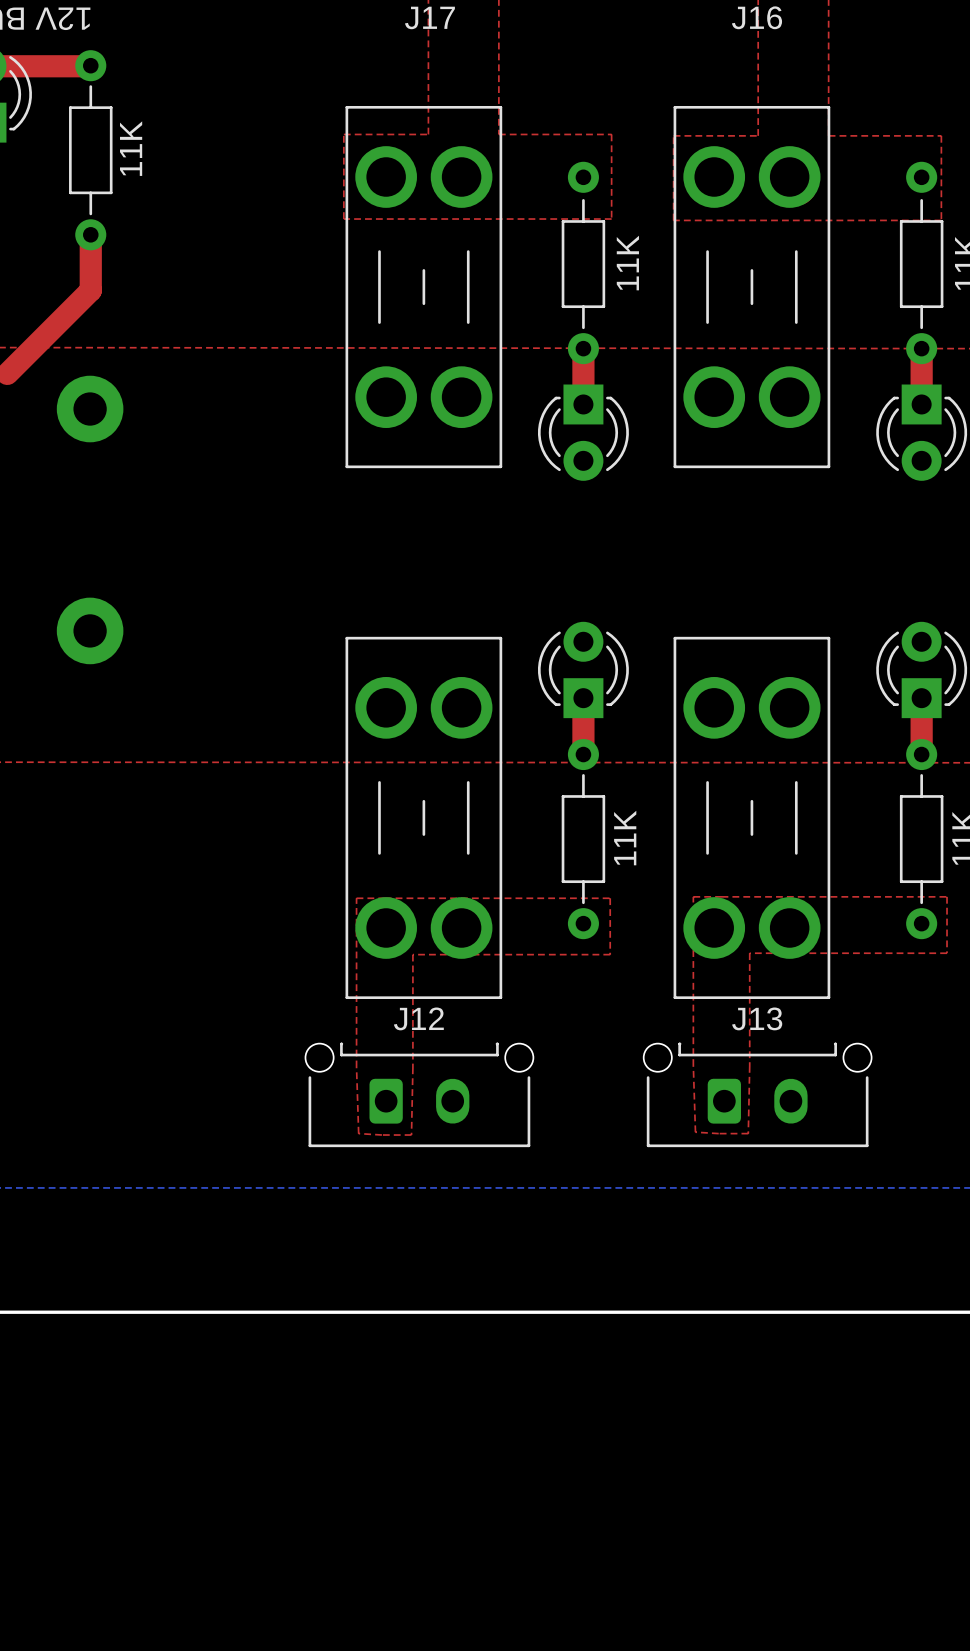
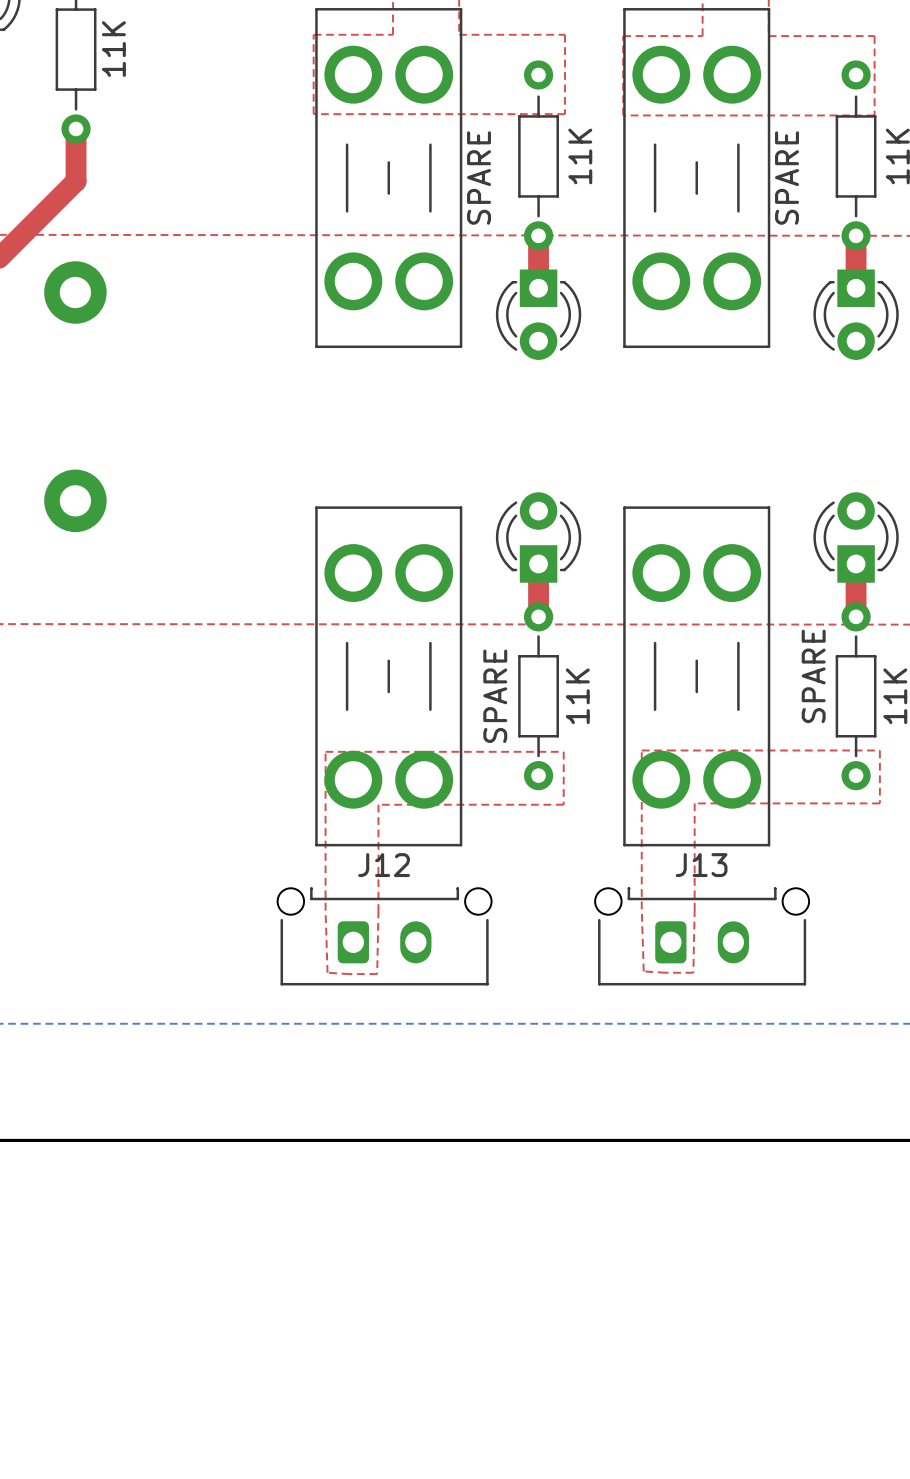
part value: none -> SPARE (479, 178)
part value: none -> SPARE (787, 178)
part value: none -> SPARE (813, 676)
part value: none -> SPARE (495, 696)

